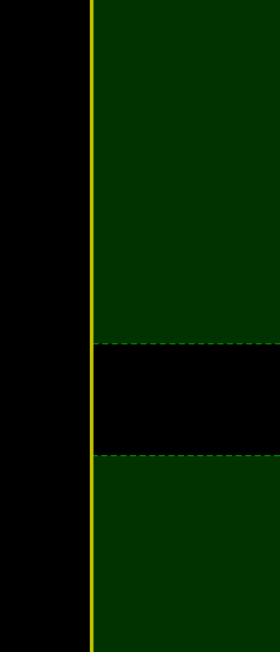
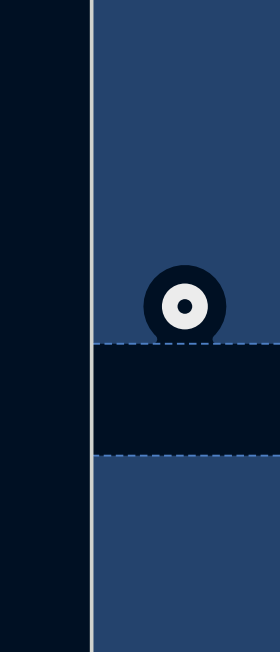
via: none -> (184, 306)

